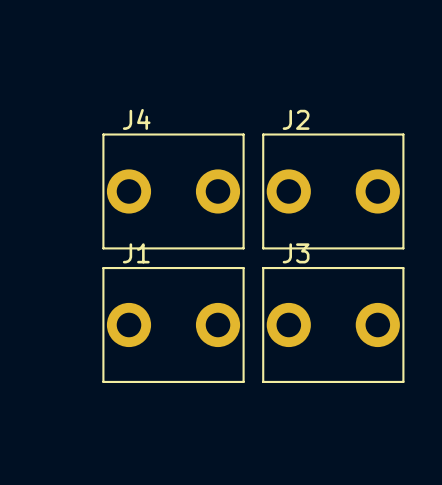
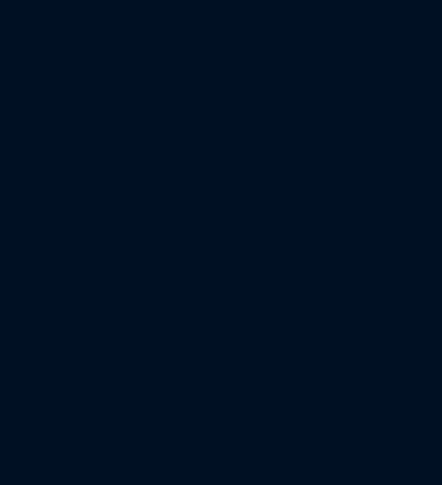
J4: (173, 191) -> none
J2: (333, 191) -> none
J1: (173, 324) -> none
J3: (333, 324) -> none

